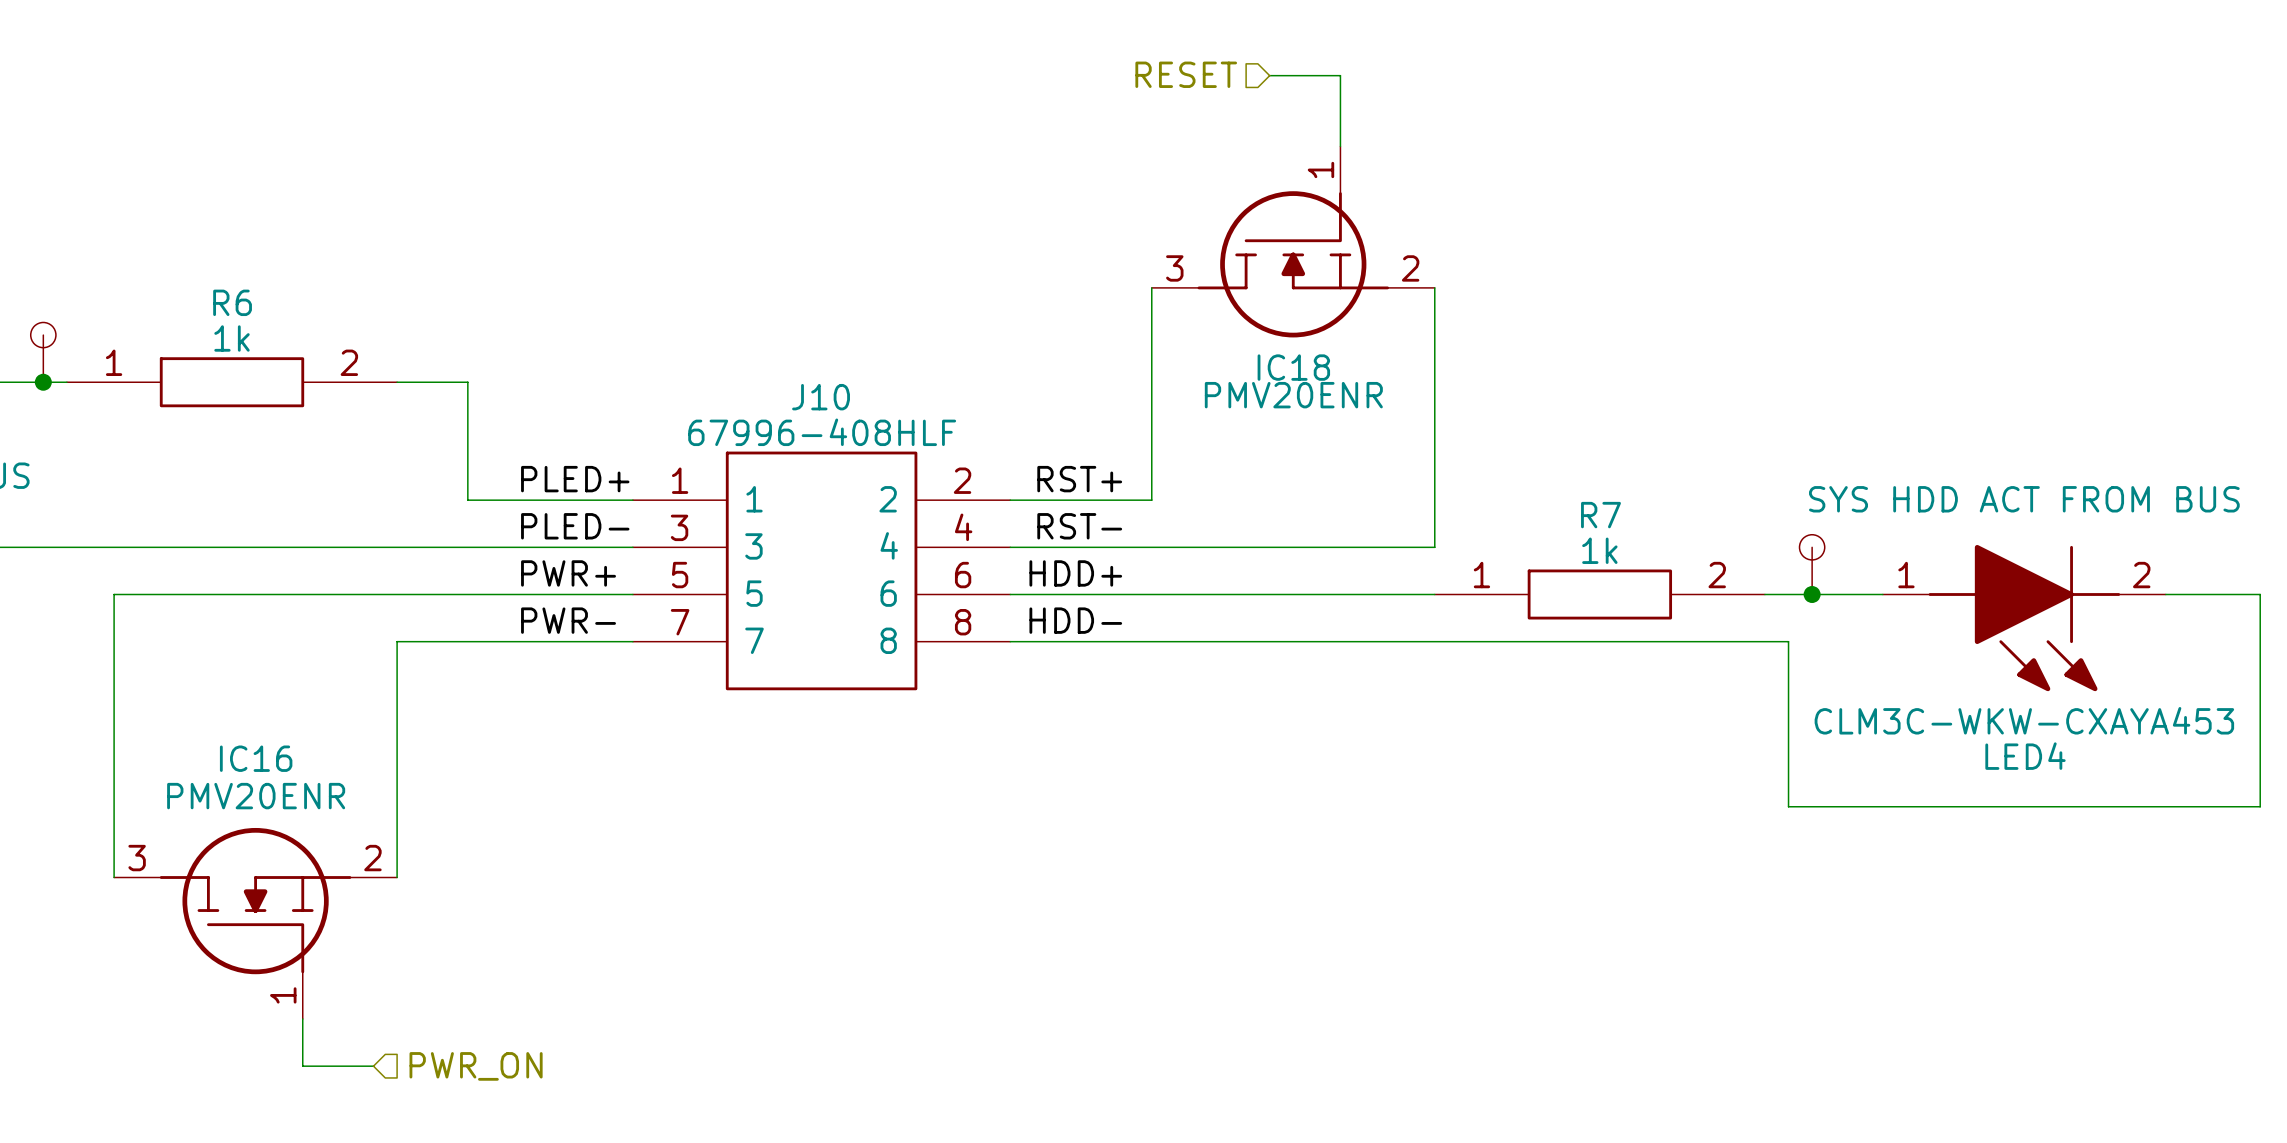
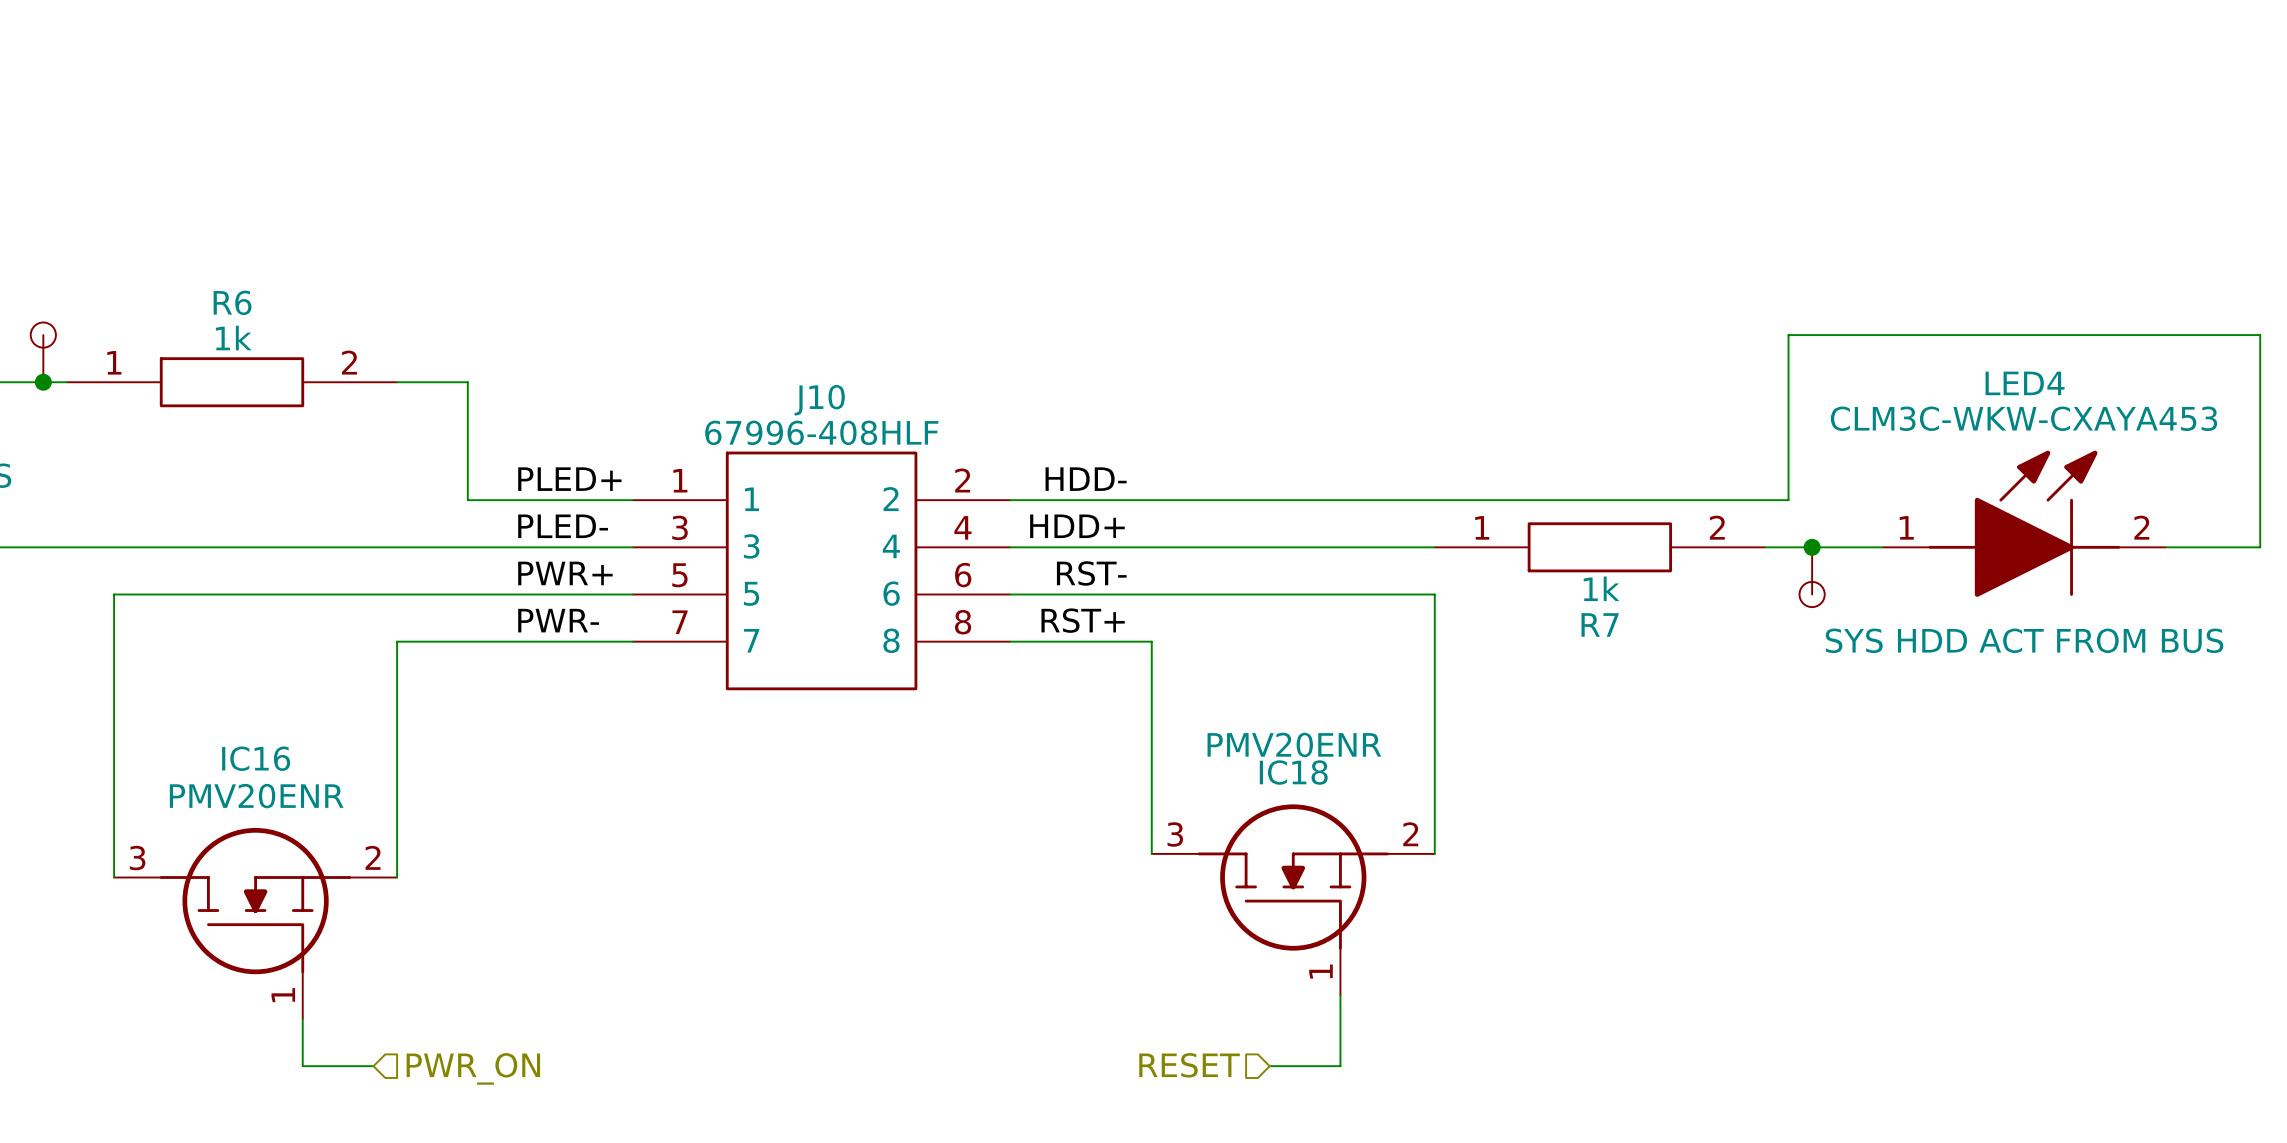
hierarchical label: RESET (1186, 74) -> none
wire: (1269, 75) (1340, 75) (1340, 146) -> none
IC18 position: (1293, 241) -> (1293, 899)
IC18 flip: as is (1293, 264) -> up-down (1293, 877)
wire: (1151, 287) (1151, 500) -> (2165, 547) (2260, 547) (2260, 335) (1788, 335) (1788, 500) (1151, 500)
wire: (1434, 287) (1434, 547) -> (1434, 594) (1434, 853)
label: RST+ (1079, 479) -> HDD- (1086, 479)
R7 name position: R7 (1600, 515) -> R7 (1600, 624)
label: RST- (1079, 526) -> HDD+ (1077, 526)
part rotation: 0° (1812, 547) -> 180° (1812, 594)
R7 value position: 1k (1599, 550) -> 1k (1601, 588)
label: HDD+ (1075, 573) -> RST- (1091, 573)
R7 position: (1599, 594) -> (1599, 547)
wire: (1764, 594) (1882, 594) -> (1764, 547) (1882, 547)
junction position: (1812, 594) -> (1812, 547)
wire: (2165, 594) (2260, 594) (2260, 806) (1788, 806) (1788, 641) (1151, 641) -> (1151, 853) (1151, 641)
LED4 flip: as is (2024, 618) -> up-down (2024, 523)
label: HDD- (1075, 620) -> RST+ (1083, 620)
wire: none -> (1340, 995) (1340, 1066) (1269, 1066)
hierarchical label: none -> RESET (1189, 1065)

